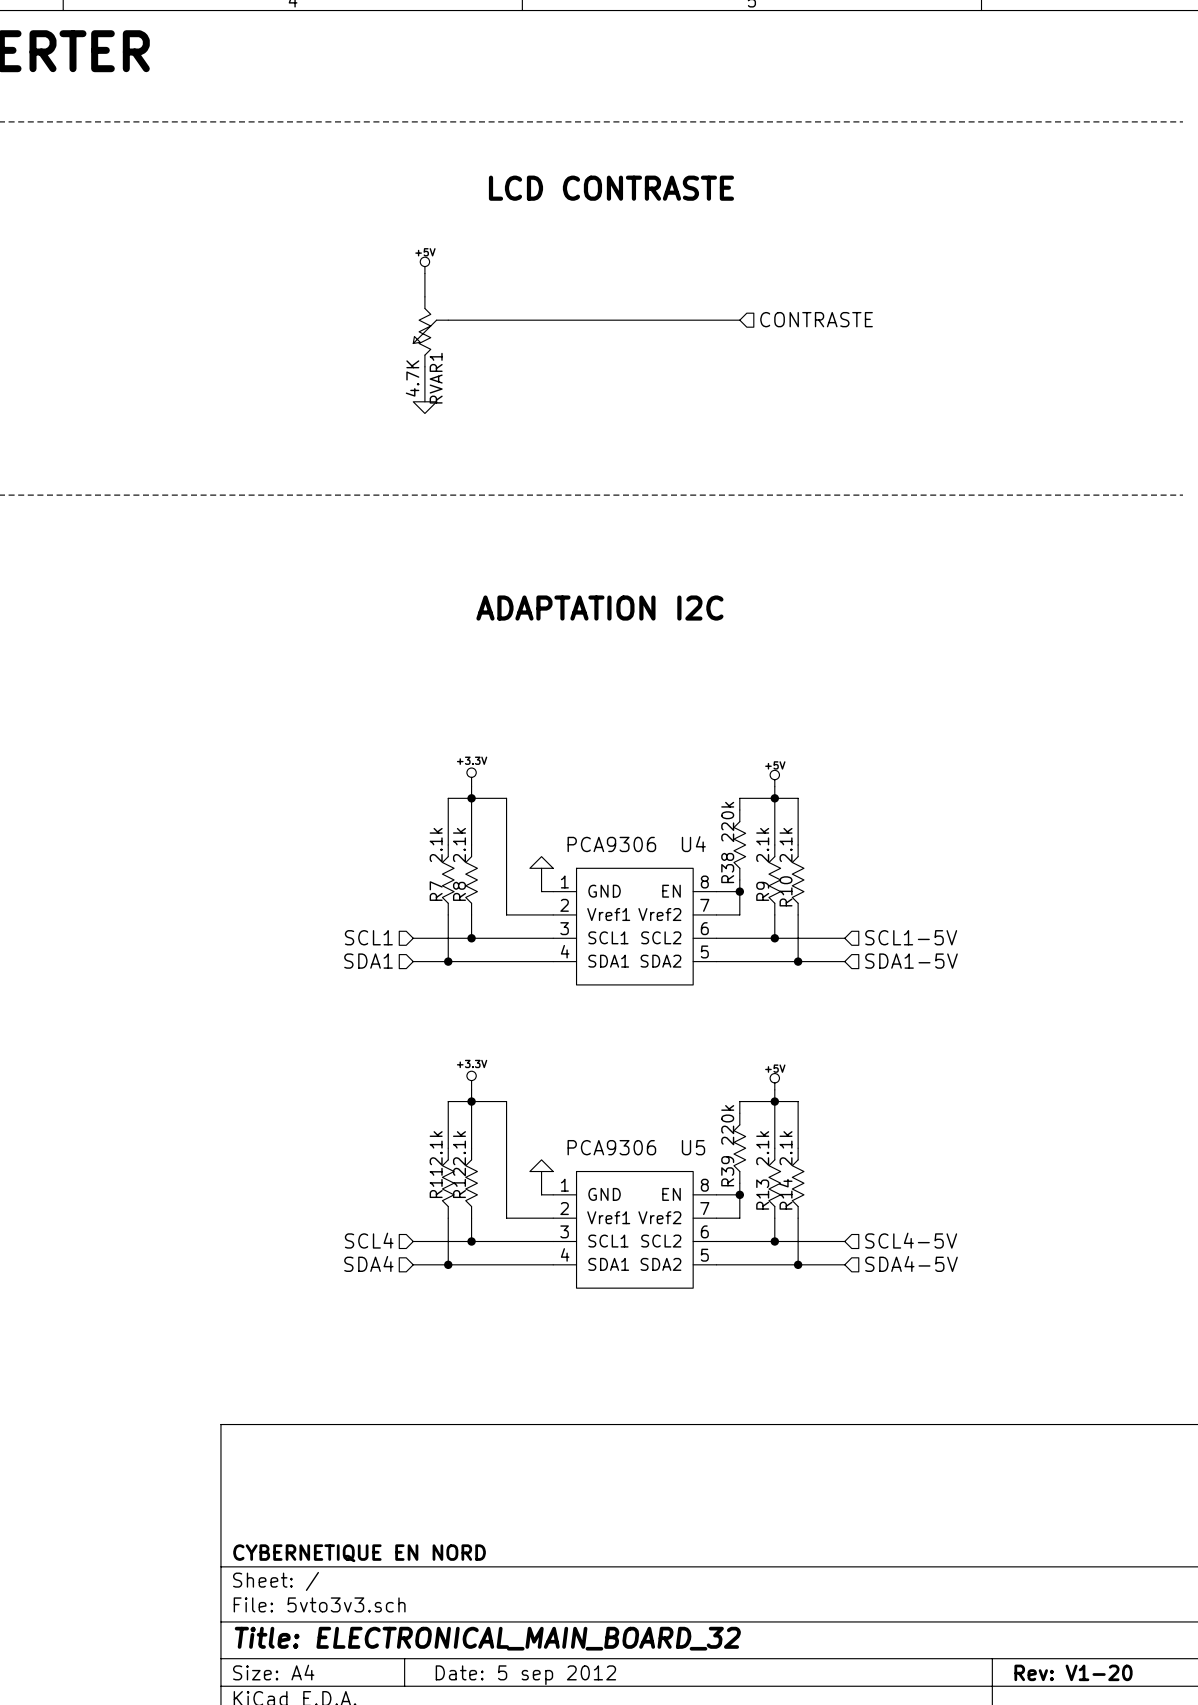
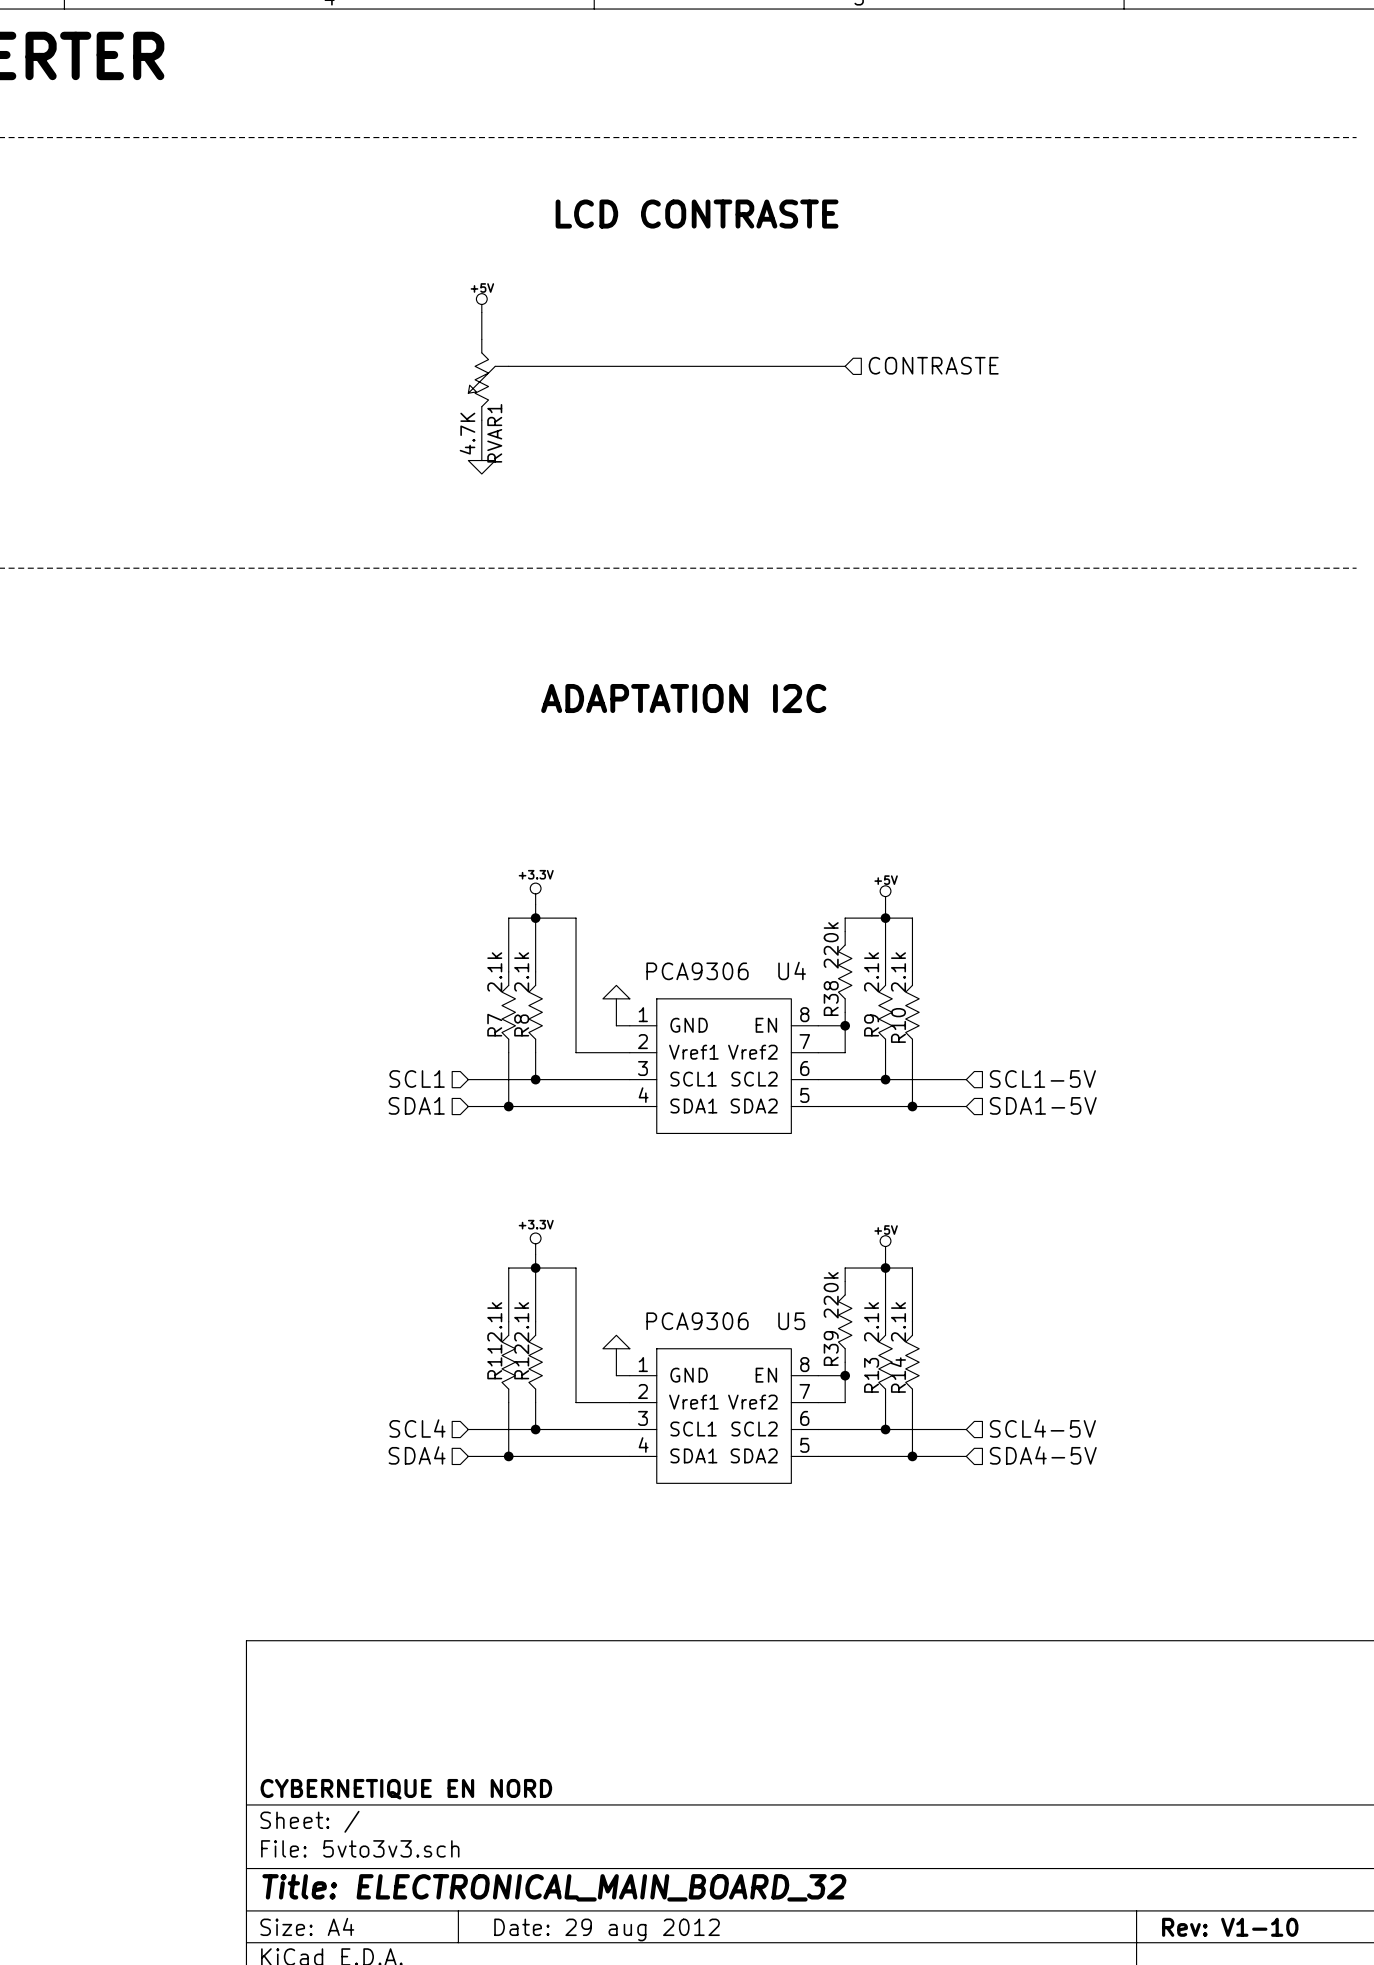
title block: Rev: V1-20 (1073, 1672) -> Rev: V1-10 (1230, 1927)
title block: Date: 5 sep 2012 (525, 1675) -> Date: 29 aug 2012 (607, 1929)

